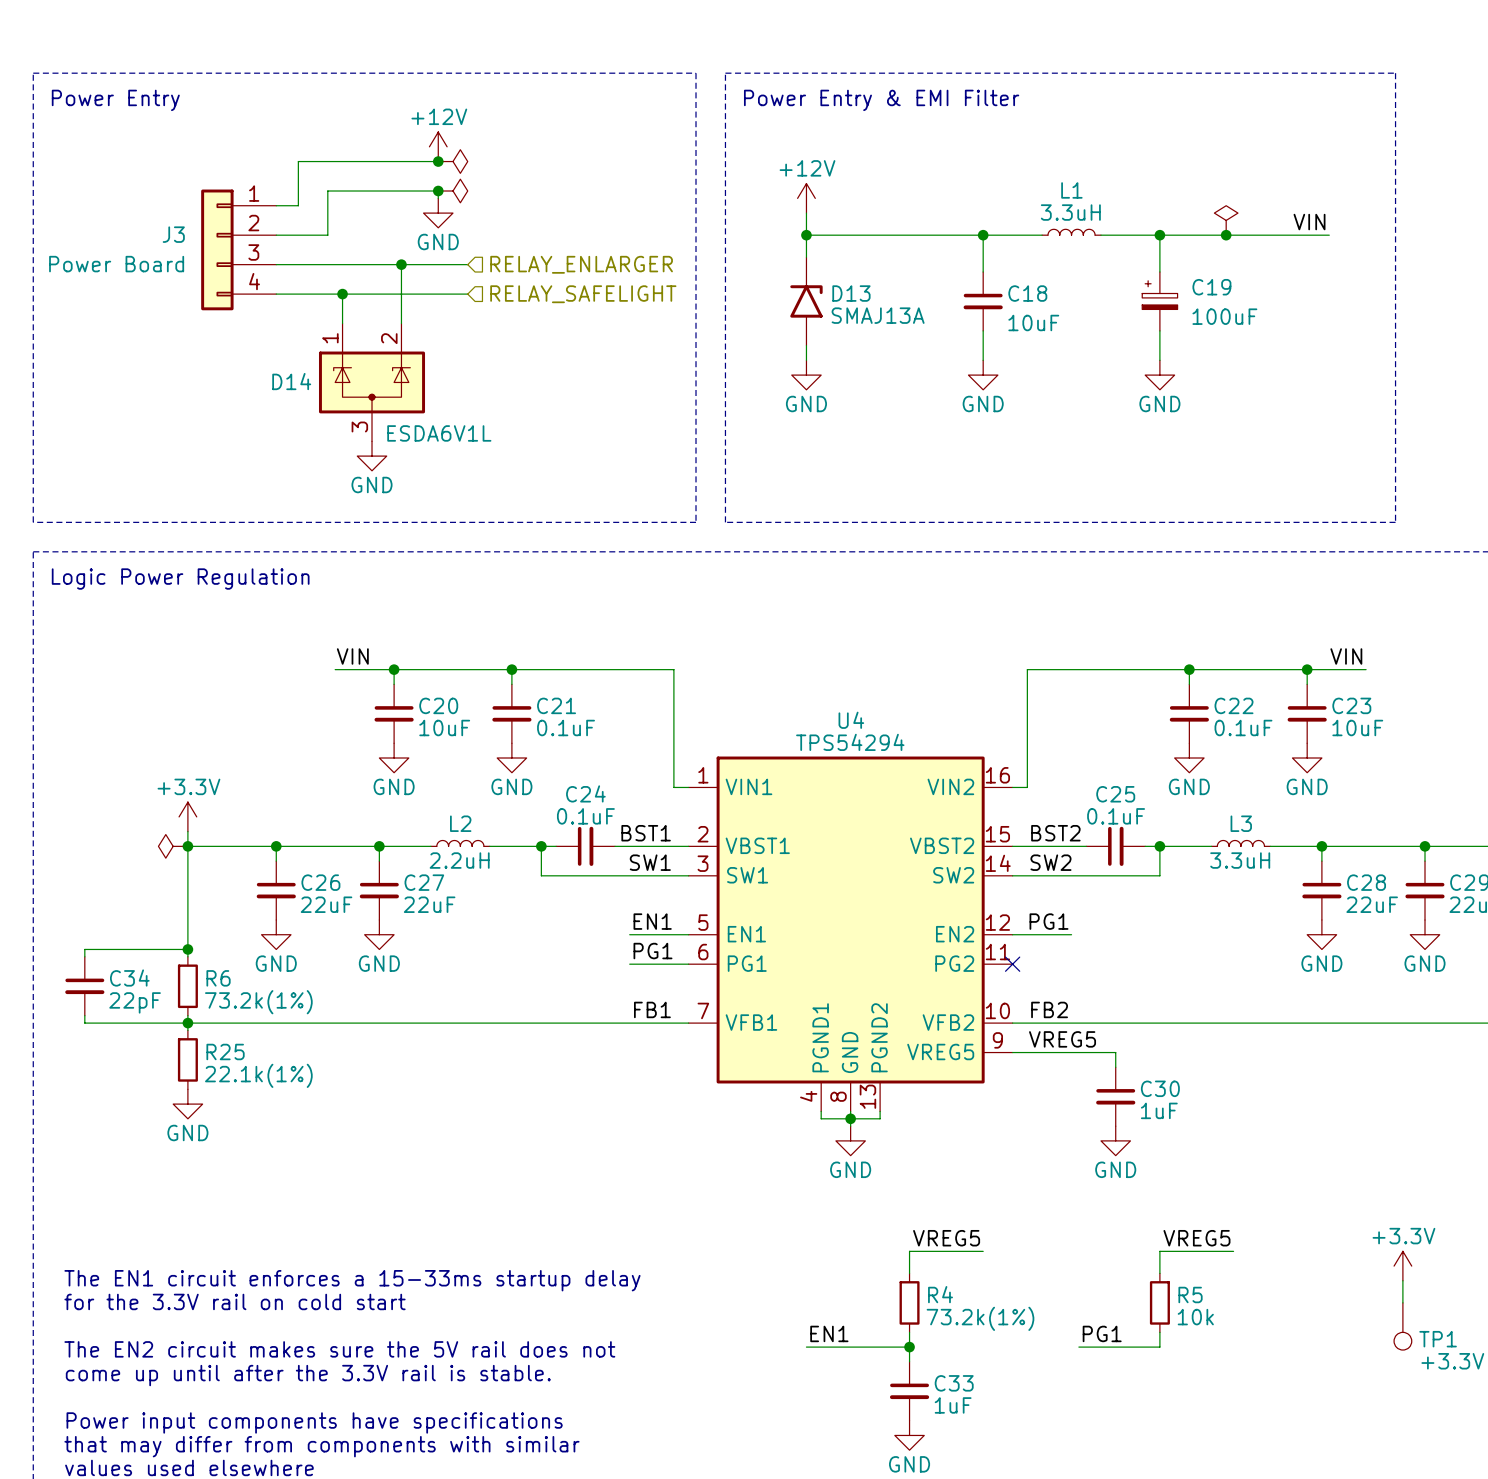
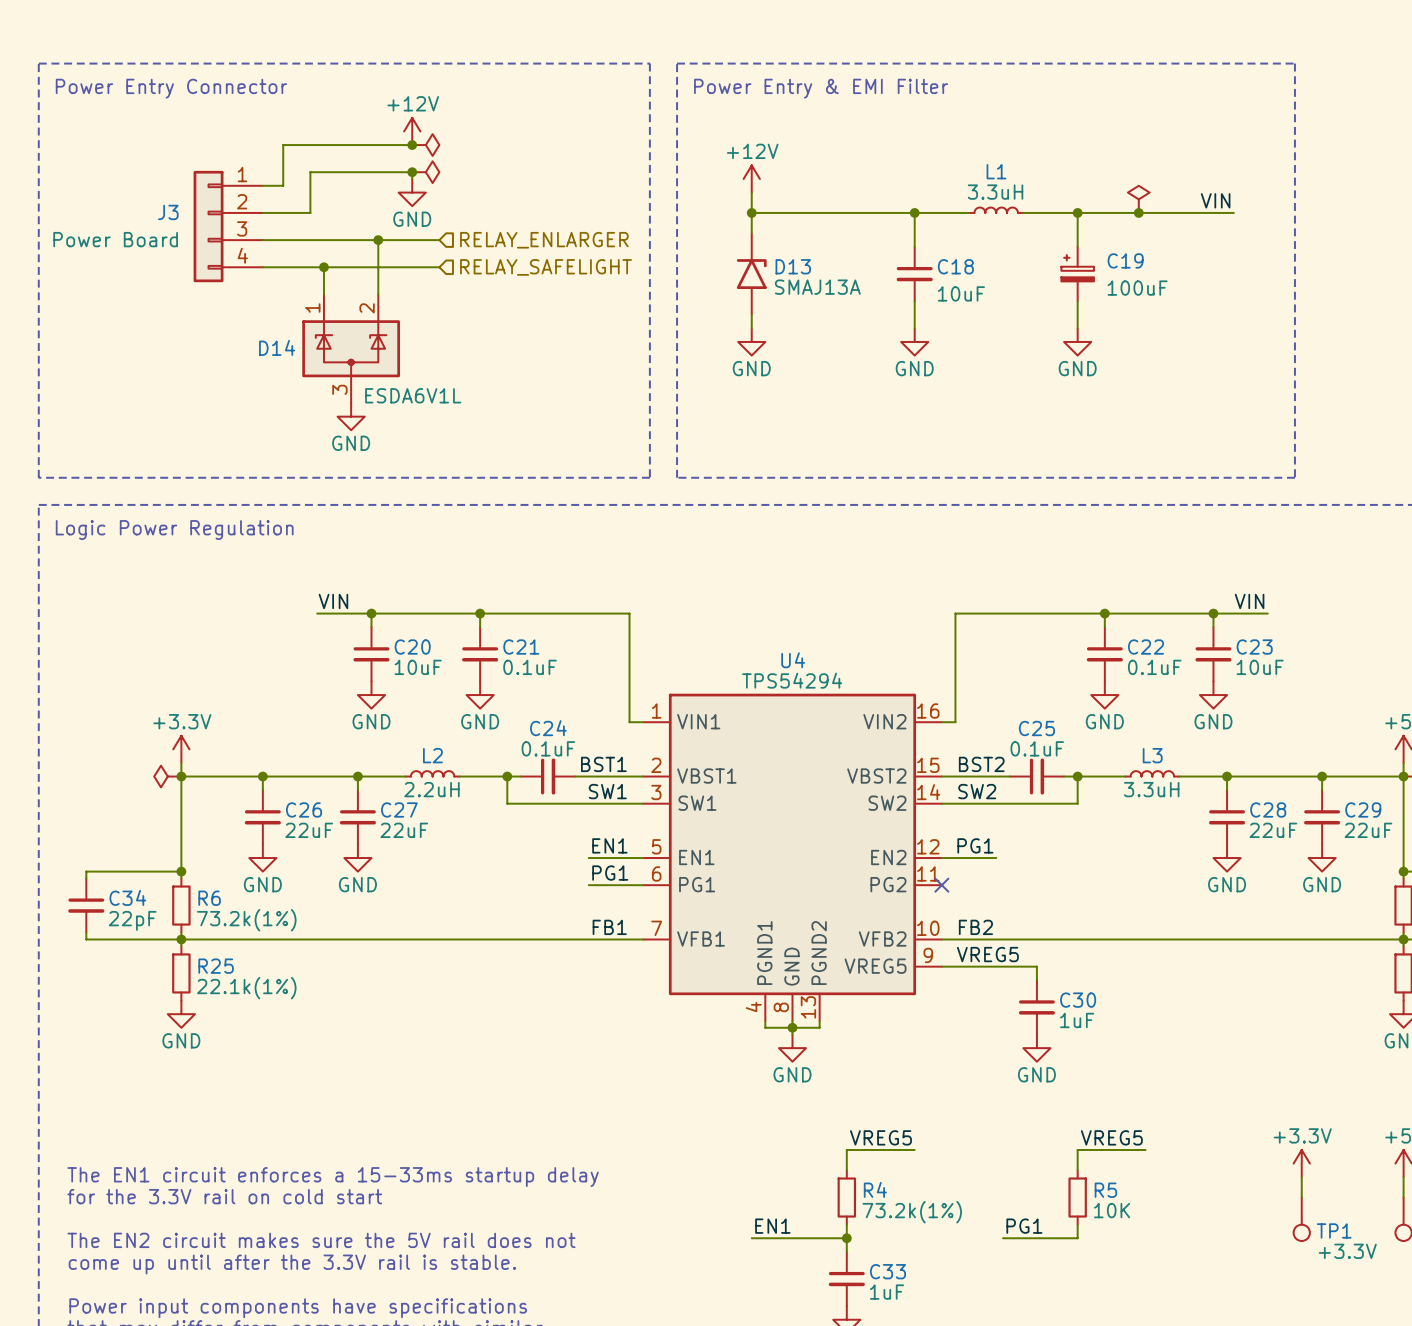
text: Power Entry (115, 100) -> Power Entry Connector (171, 88)
R5 value: 10k (1195, 1317) -> 10K (1112, 1210)

